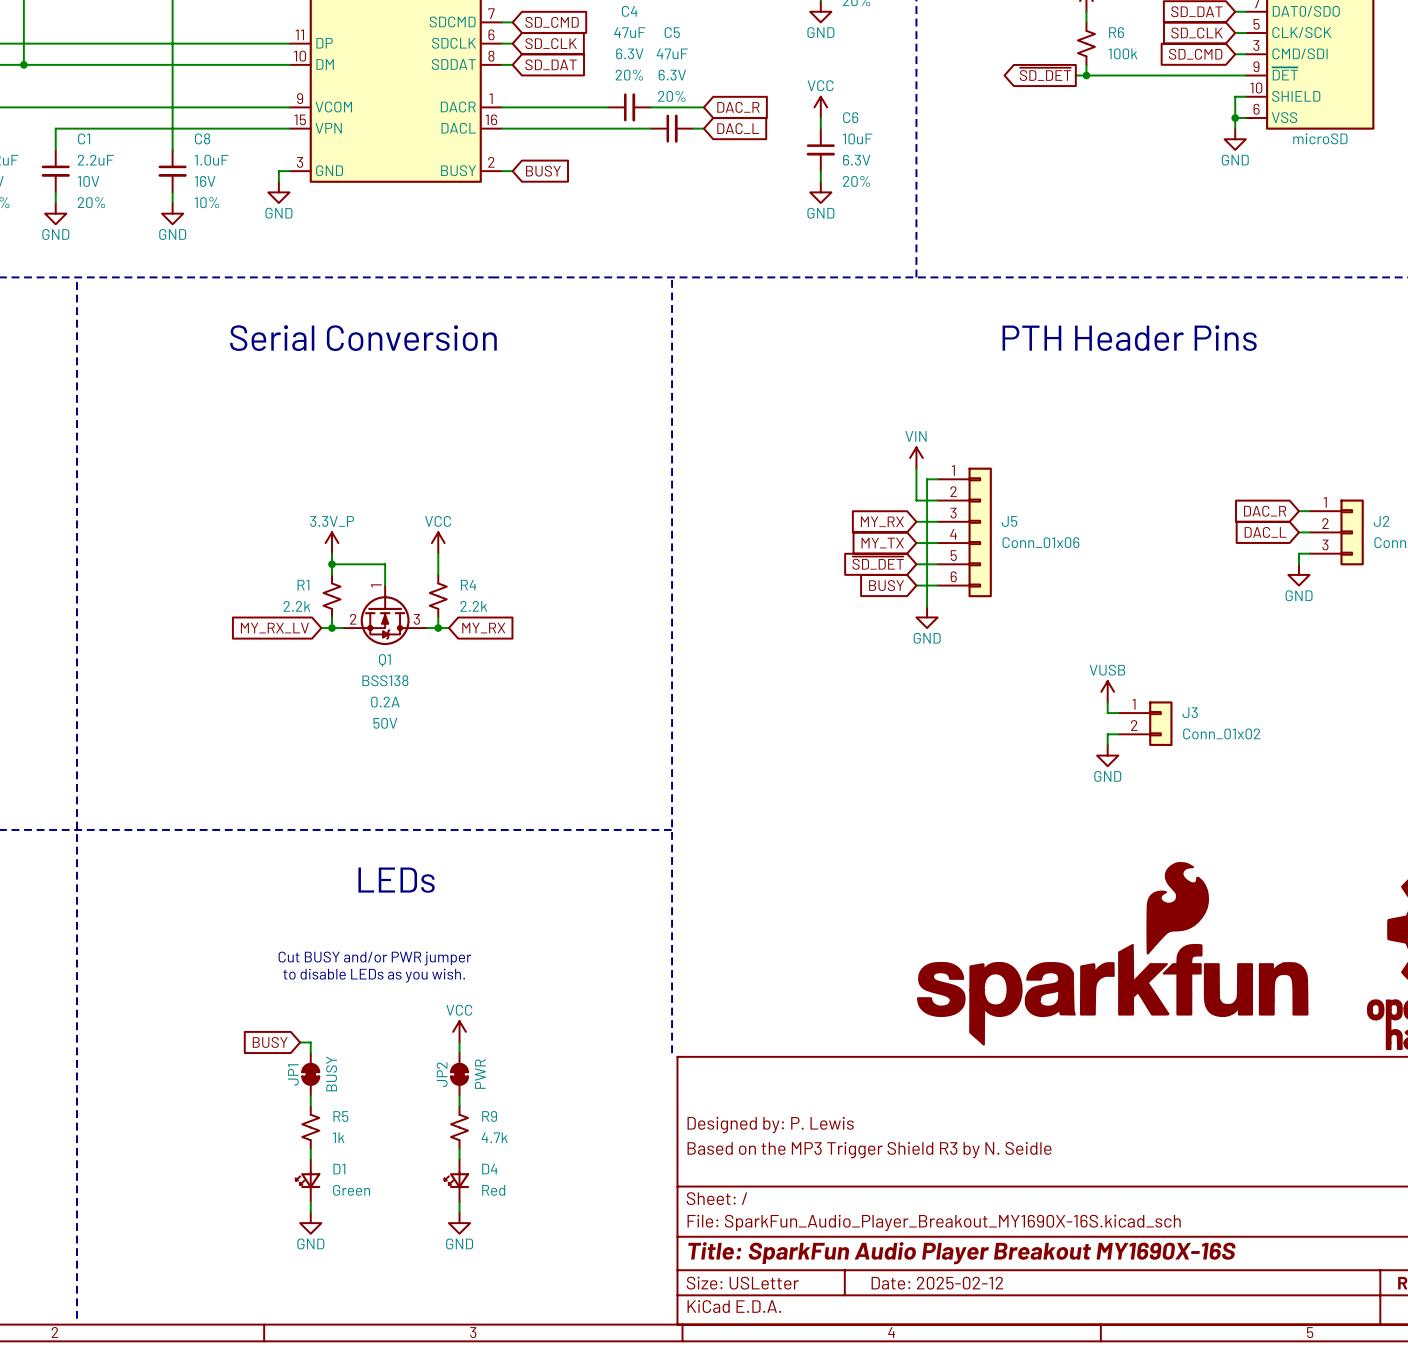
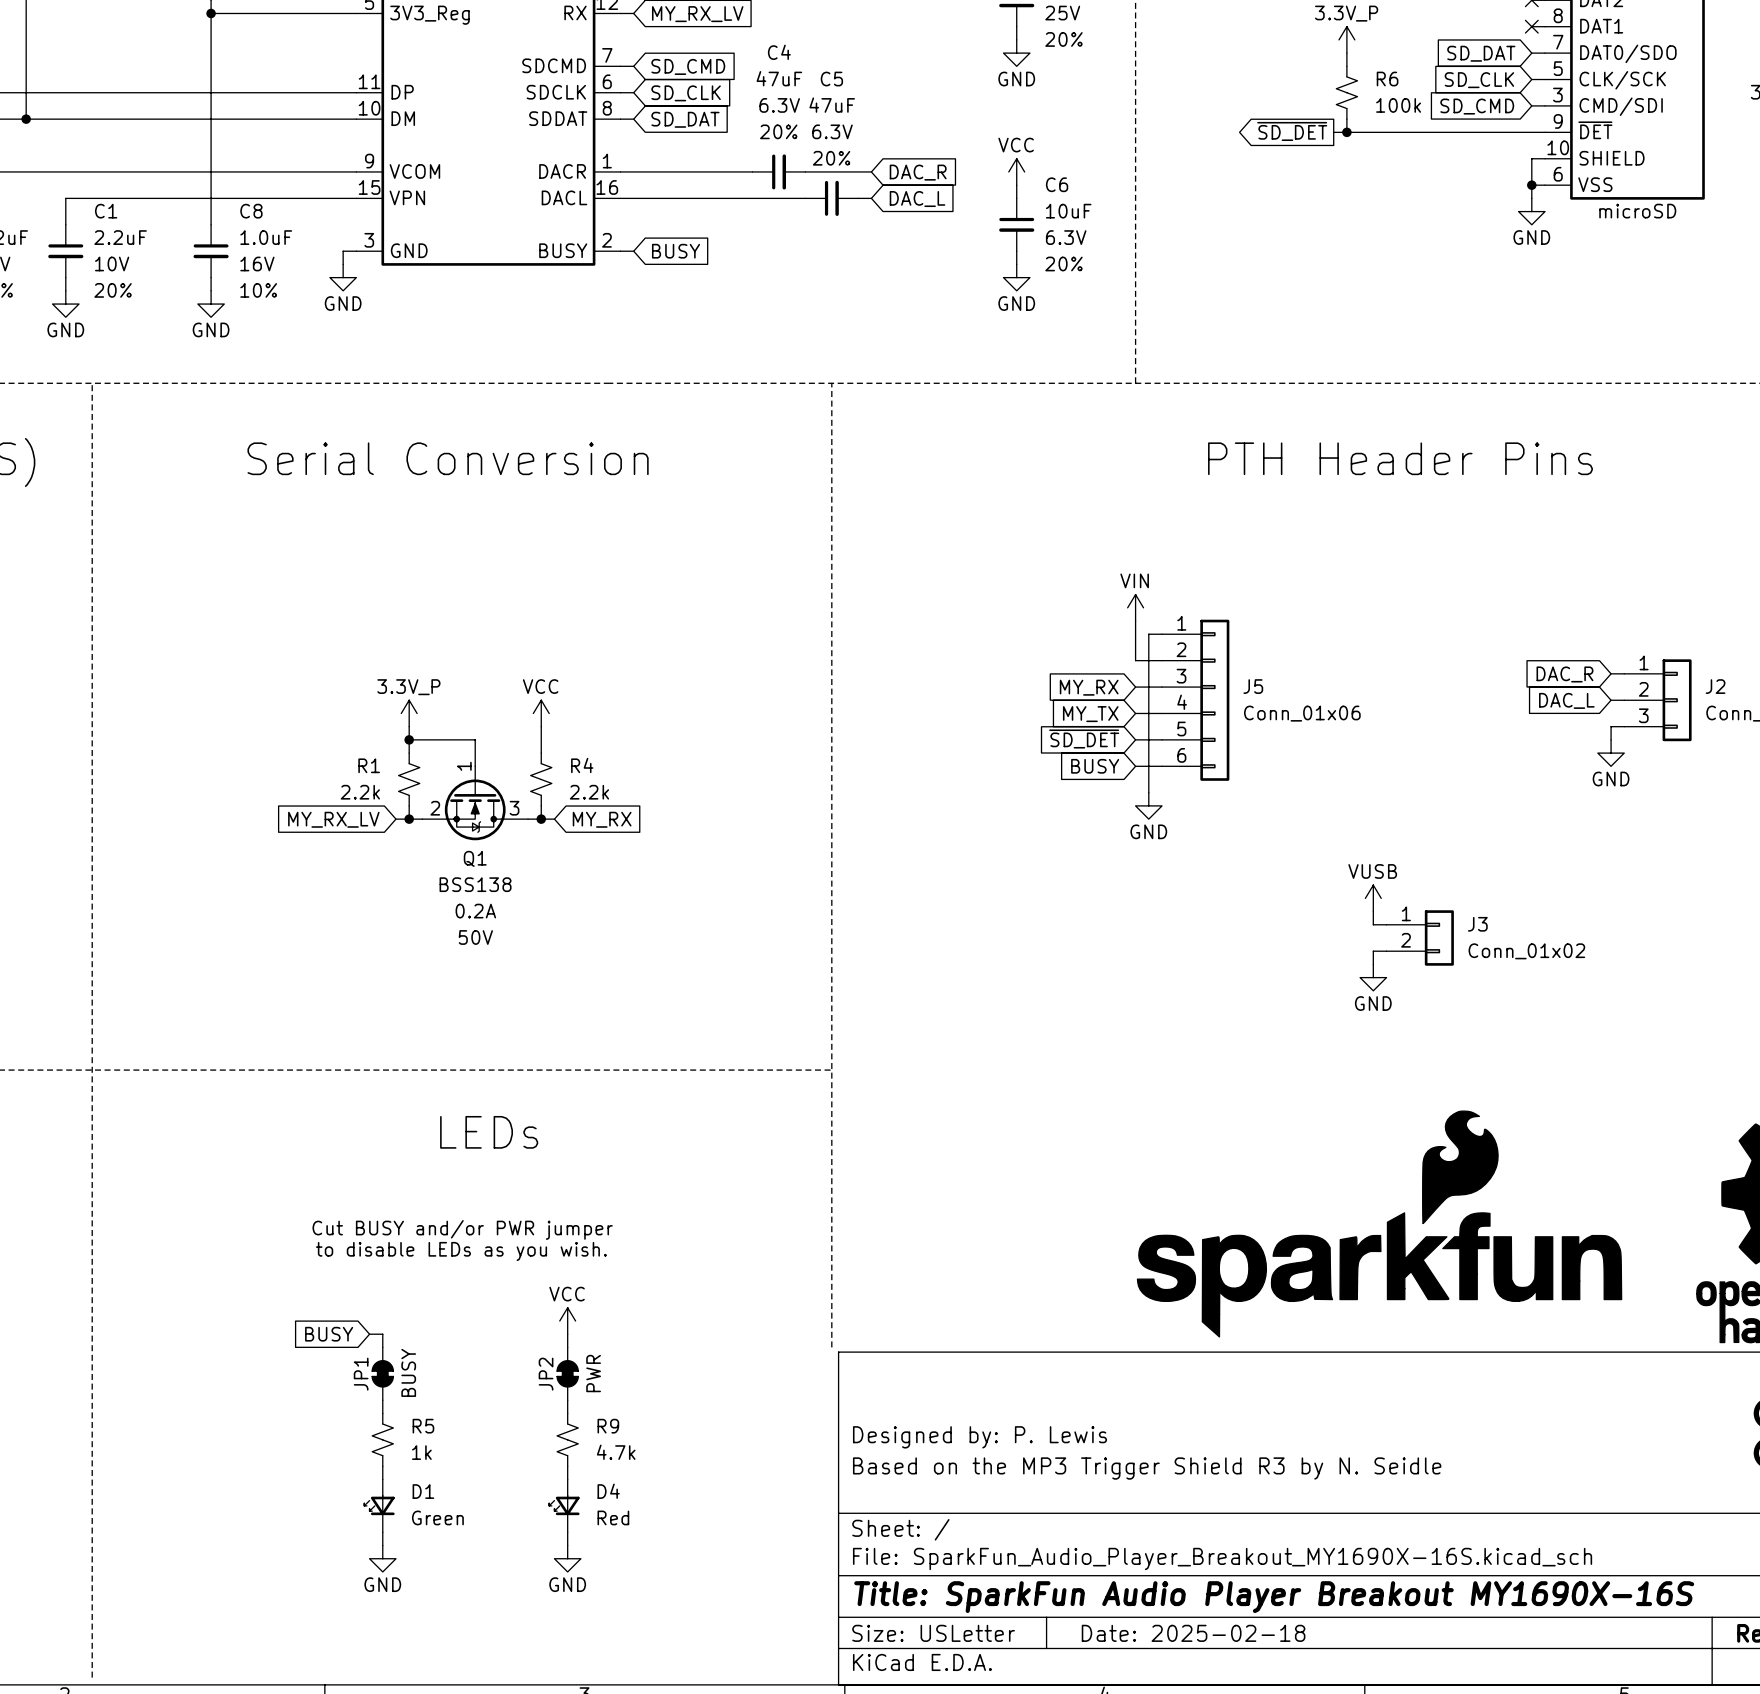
title block: Date: 2025-02-12 (937, 1283) -> Date: 2025-02-18 (1193, 1633)

